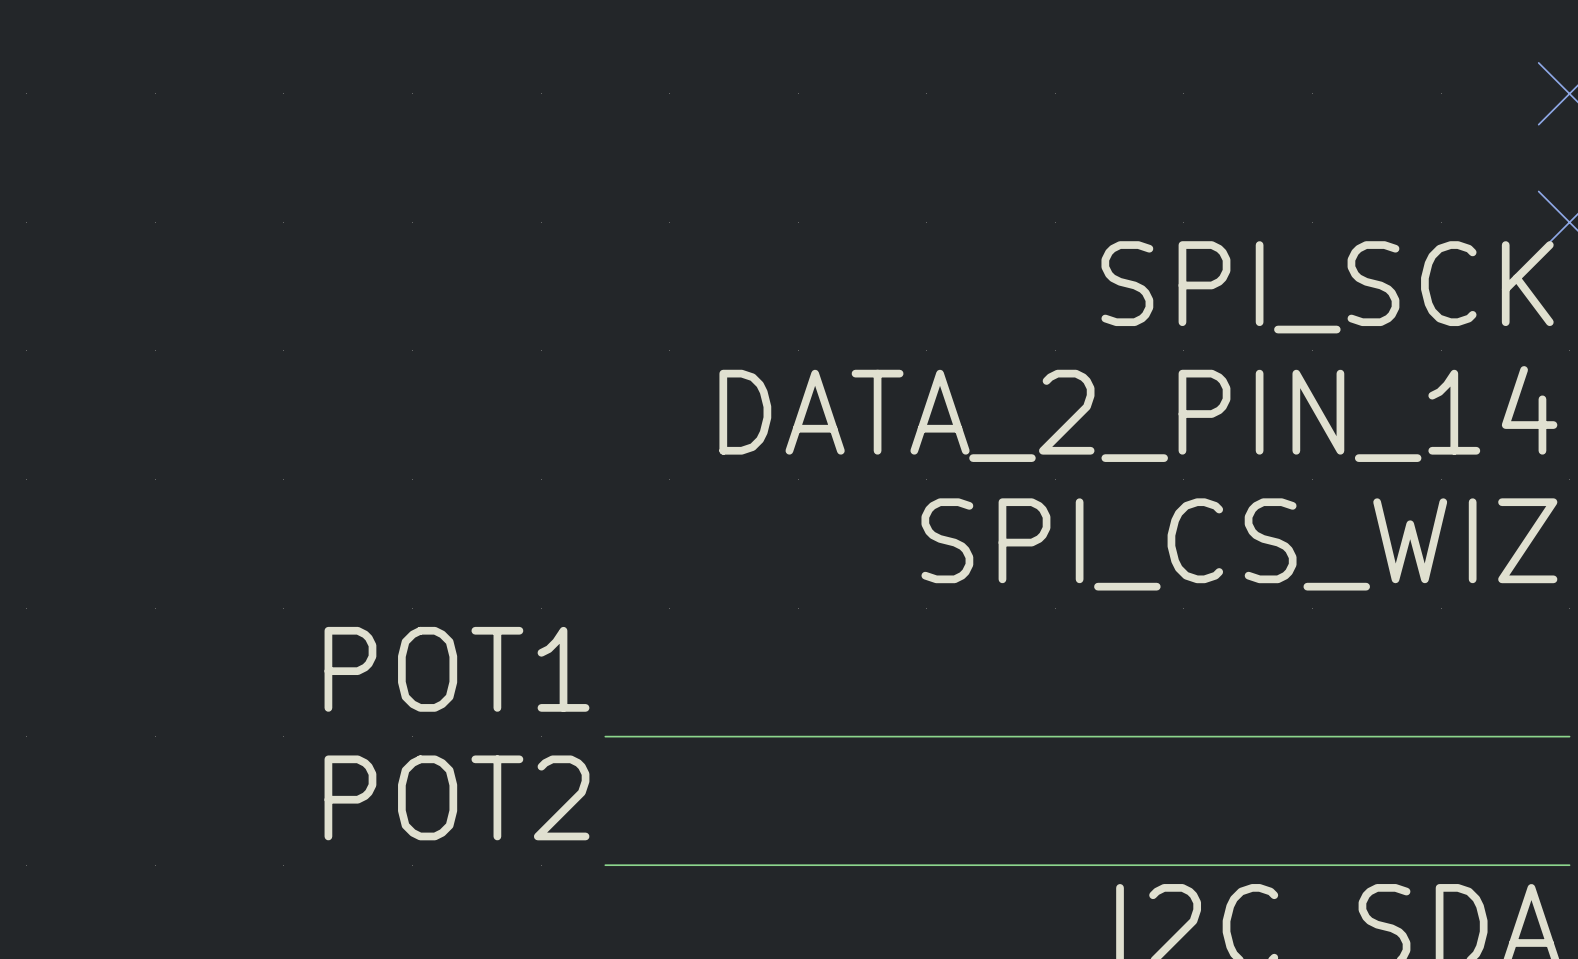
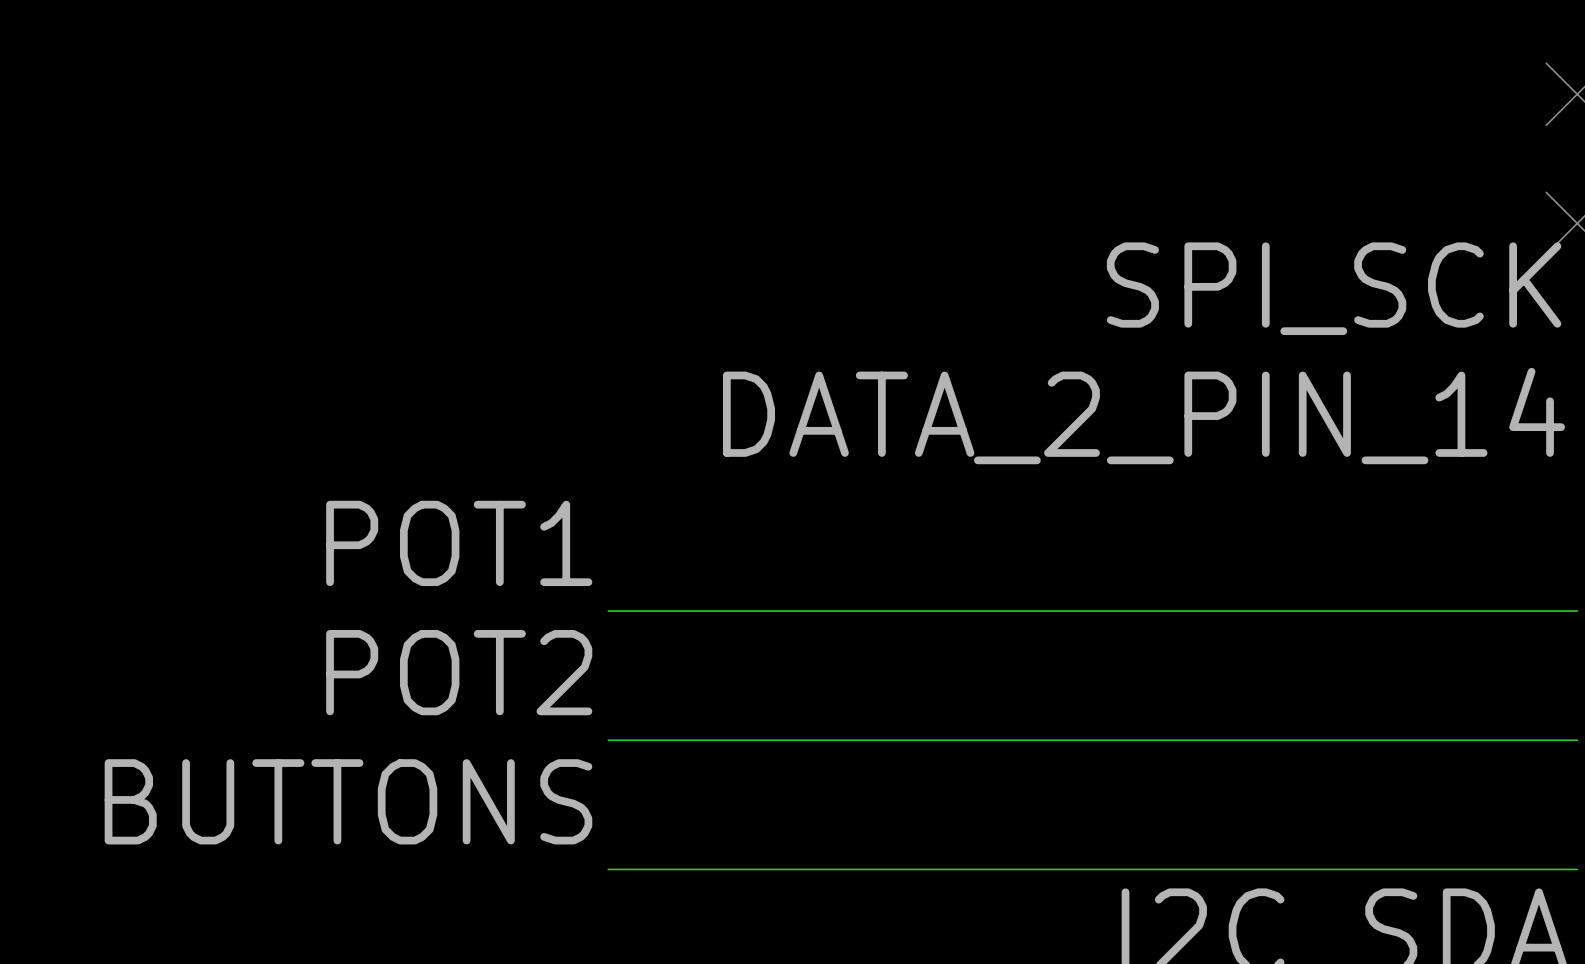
label: none -> POT1 (459, 543)
label: SPI_CS_WIZ (1239, 544) -> none
wire: none -> (608, 611) (1577, 611)
label: POT1 (456, 669) -> POT2 (459, 672)
label: POT2 (456, 797) -> BUTTONS (348, 801)

